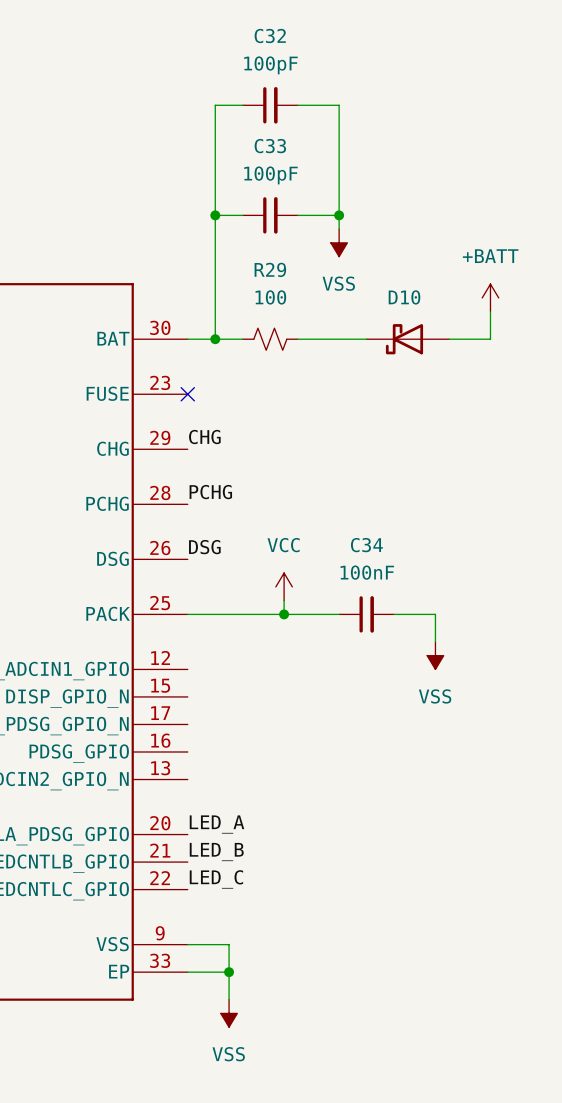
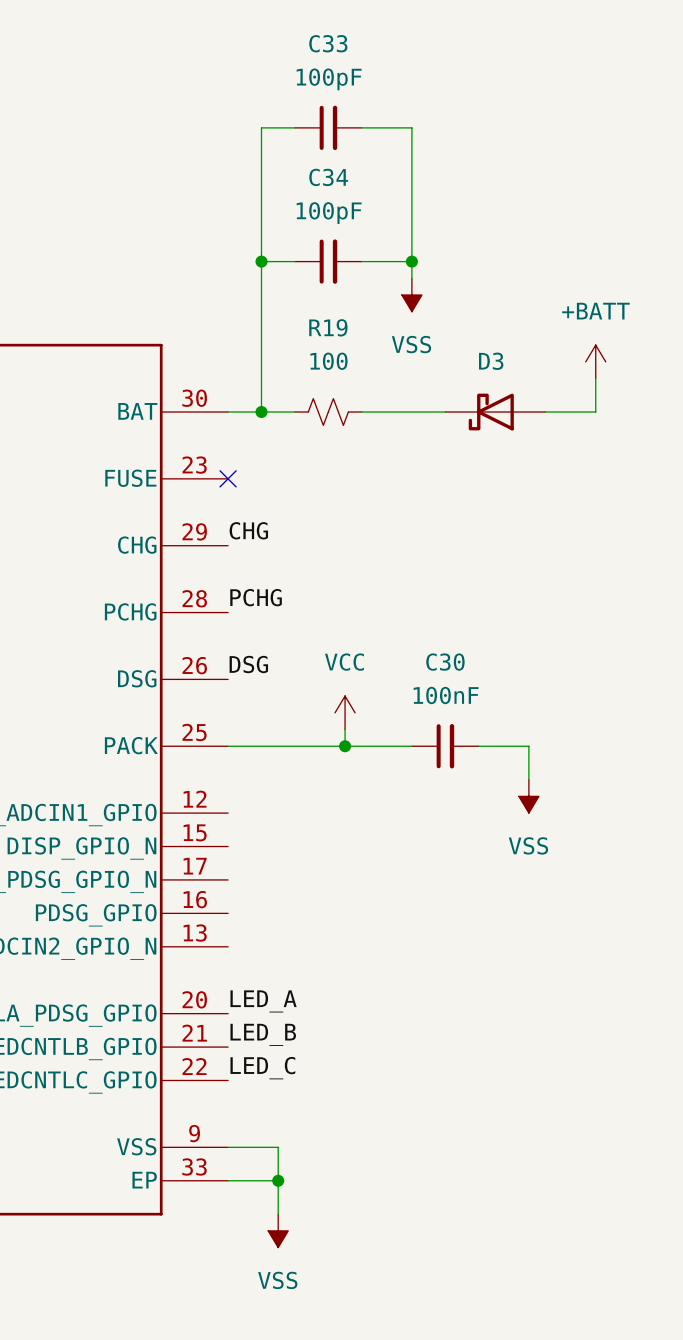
C32 name: C32 (270, 36) -> C33 (328, 43)
C33 name: C33 (270, 146) -> C34 (328, 177)
R29 name: R29 (270, 269) -> R19 (328, 327)
D10 name: D10 (404, 297) -> D3 (491, 361)
C34 name: C34 (366, 545) -> C30 (445, 662)

